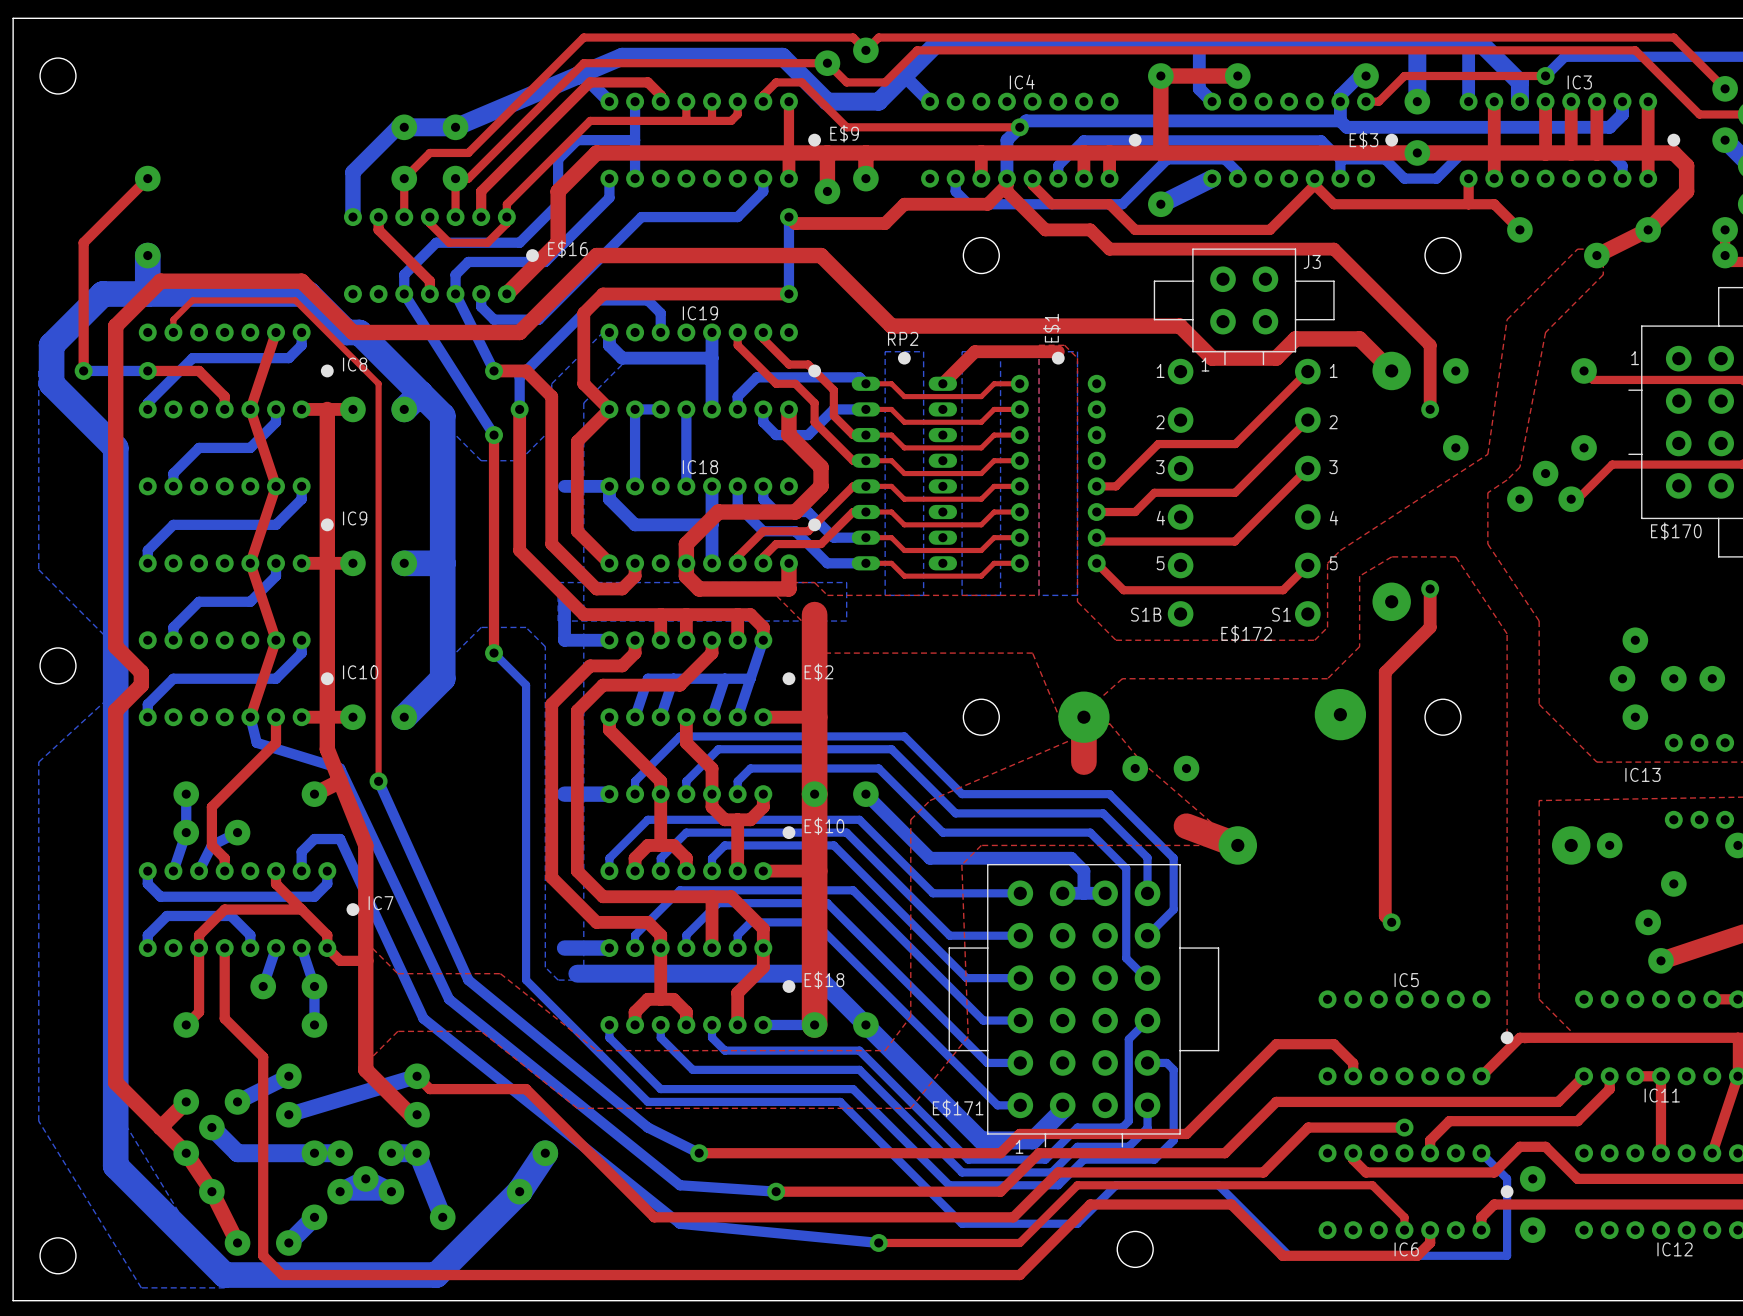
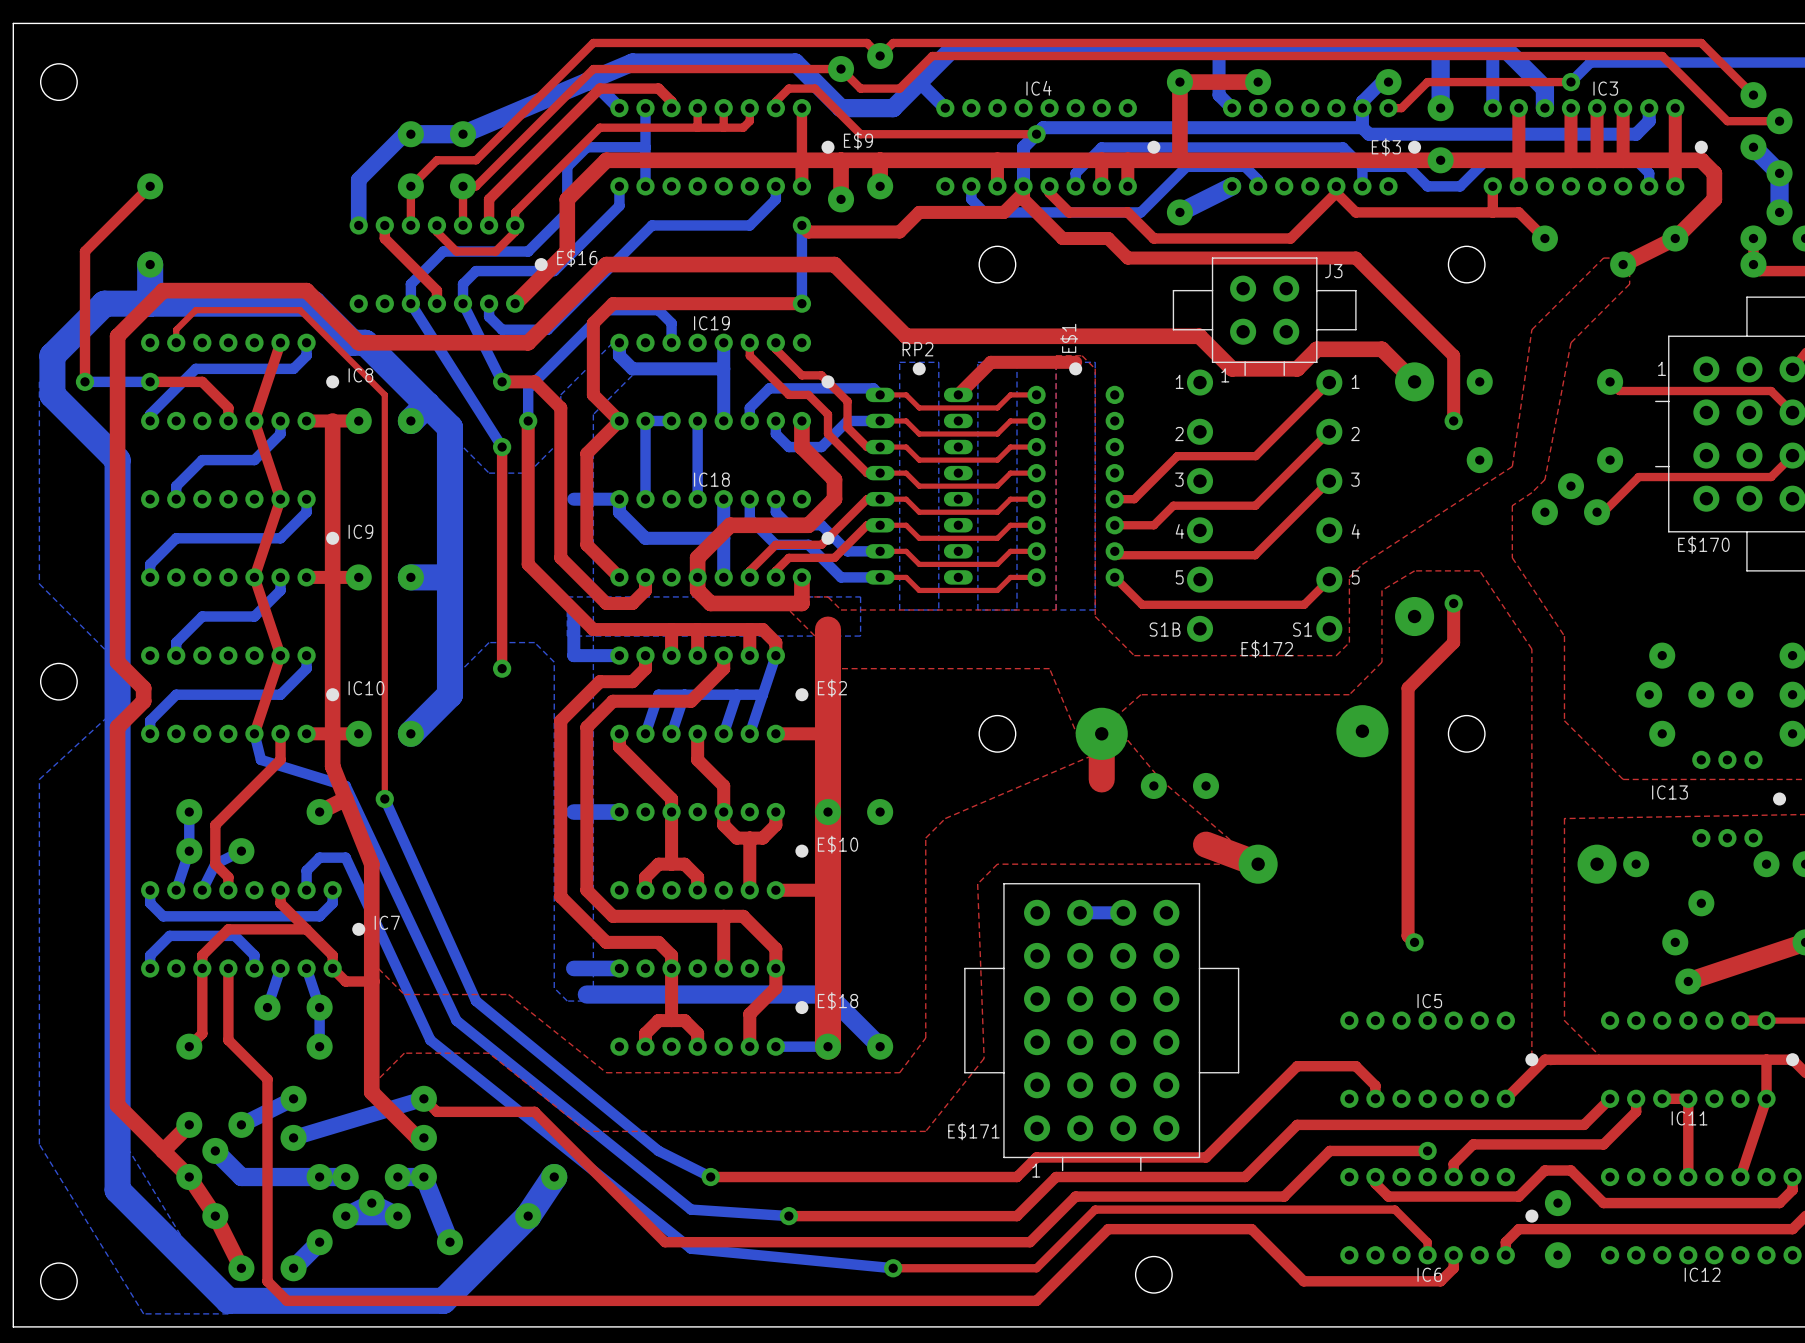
bottom track: (494, 653) (526, 685) (526, 980) (647, 1101) (840, 1101) (962, 1223) (1077, 1223) (1115, 1185) (1218, 1185) (1289, 1255) (1507, 1255) (1507, 1178) (1481, 1153) -> none
bottom track: (635, 794) (635, 781) (679, 736) (904, 736) (962, 794) (1109, 794) (1173, 858) (1173, 909) (1147, 935) -> none
bottom track: (686, 794) (686, 781) (718, 749) (891, 749) (955, 813) (1103, 813) (1147, 857) (1147, 893) -> none
bottom track: (737, 794) (737, 781) (750, 768) (878, 768) (942, 832) (1090, 832) (1126, 868) (1126, 958) (1147, 978) -> none
bottom track: (865, 794) (930, 858) (1071, 858) (1083, 871) (1083, 893) -> none
bottom track: (609, 871) (609, 858) (647, 819) (859, 819) (933, 893) (1020, 893) -> none
bottom track: (660, 871) (660, 858) (686, 832) (846, 832) (949, 935) (1020, 935) -> none
bottom track: (712, 871) (712, 858) (724, 845) (833, 845) (966, 978) (1020, 978) -> none
bottom track: (635, 948) (635, 935) (679, 890) (853, 890) (983, 1020) (1020, 1020) -> none
bottom track: (686, 948) (686, 935) (718, 903) (827, 903) (987, 1062) (1020, 1062) -> none
bottom track: (737, 948) (737, 935) (750, 922) (814, 922) (997, 1105) (1020, 1105) -> none
bottom track: (1147, 1020) (1128, 1039) (1128, 1121) (1122, 1127) (1077, 1127) (1045, 1159) (968, 1159) (859, 1050) (724, 1050) (712, 1037) (712, 1024) -> none
bottom track: (609, 1024) (609, 1037) (660, 1089) (853, 1089) (949, 1185) (1058, 1185) (1083, 1159) (1154, 1159) (1173, 1140) (1173, 1069) (1166, 1062) (1147, 1062) -> none
bottom track: (660, 1024) (660, 1037) (692, 1069) (859, 1069) (962, 1172) (1051, 1172) (1077, 1146) (1128, 1146) (1147, 1128) (1147, 1105) -> none
bottom track: (865, 1024) (981, 1140) (1032, 1140) (1062, 1110) (1062, 1105) -> none

